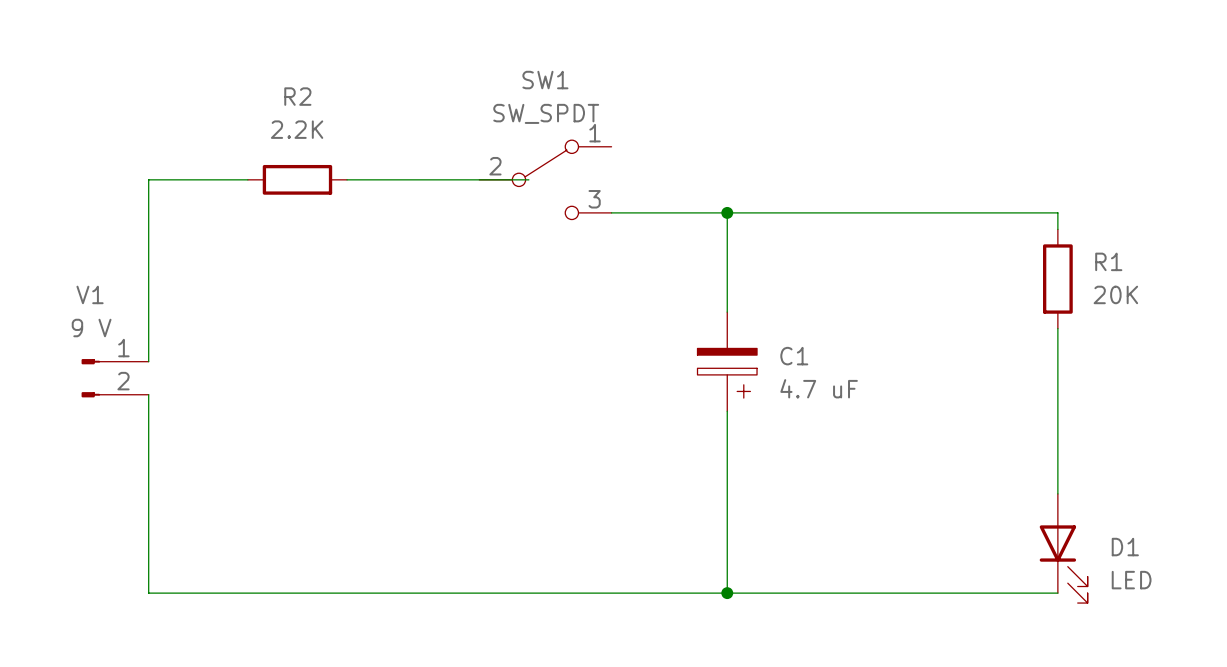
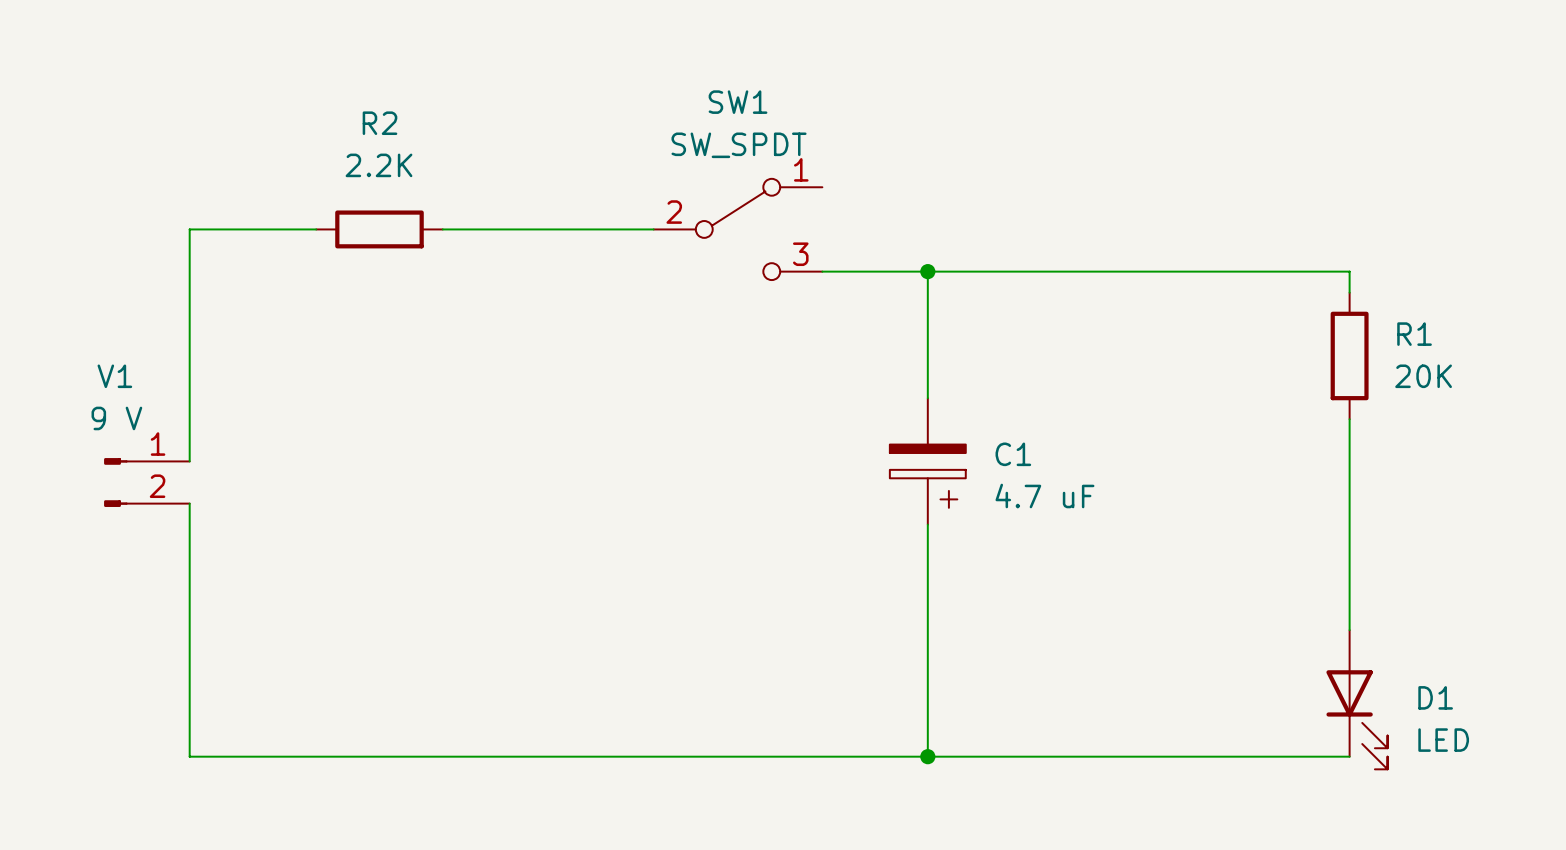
SW1 position: (545, 179) -> (738, 229)

